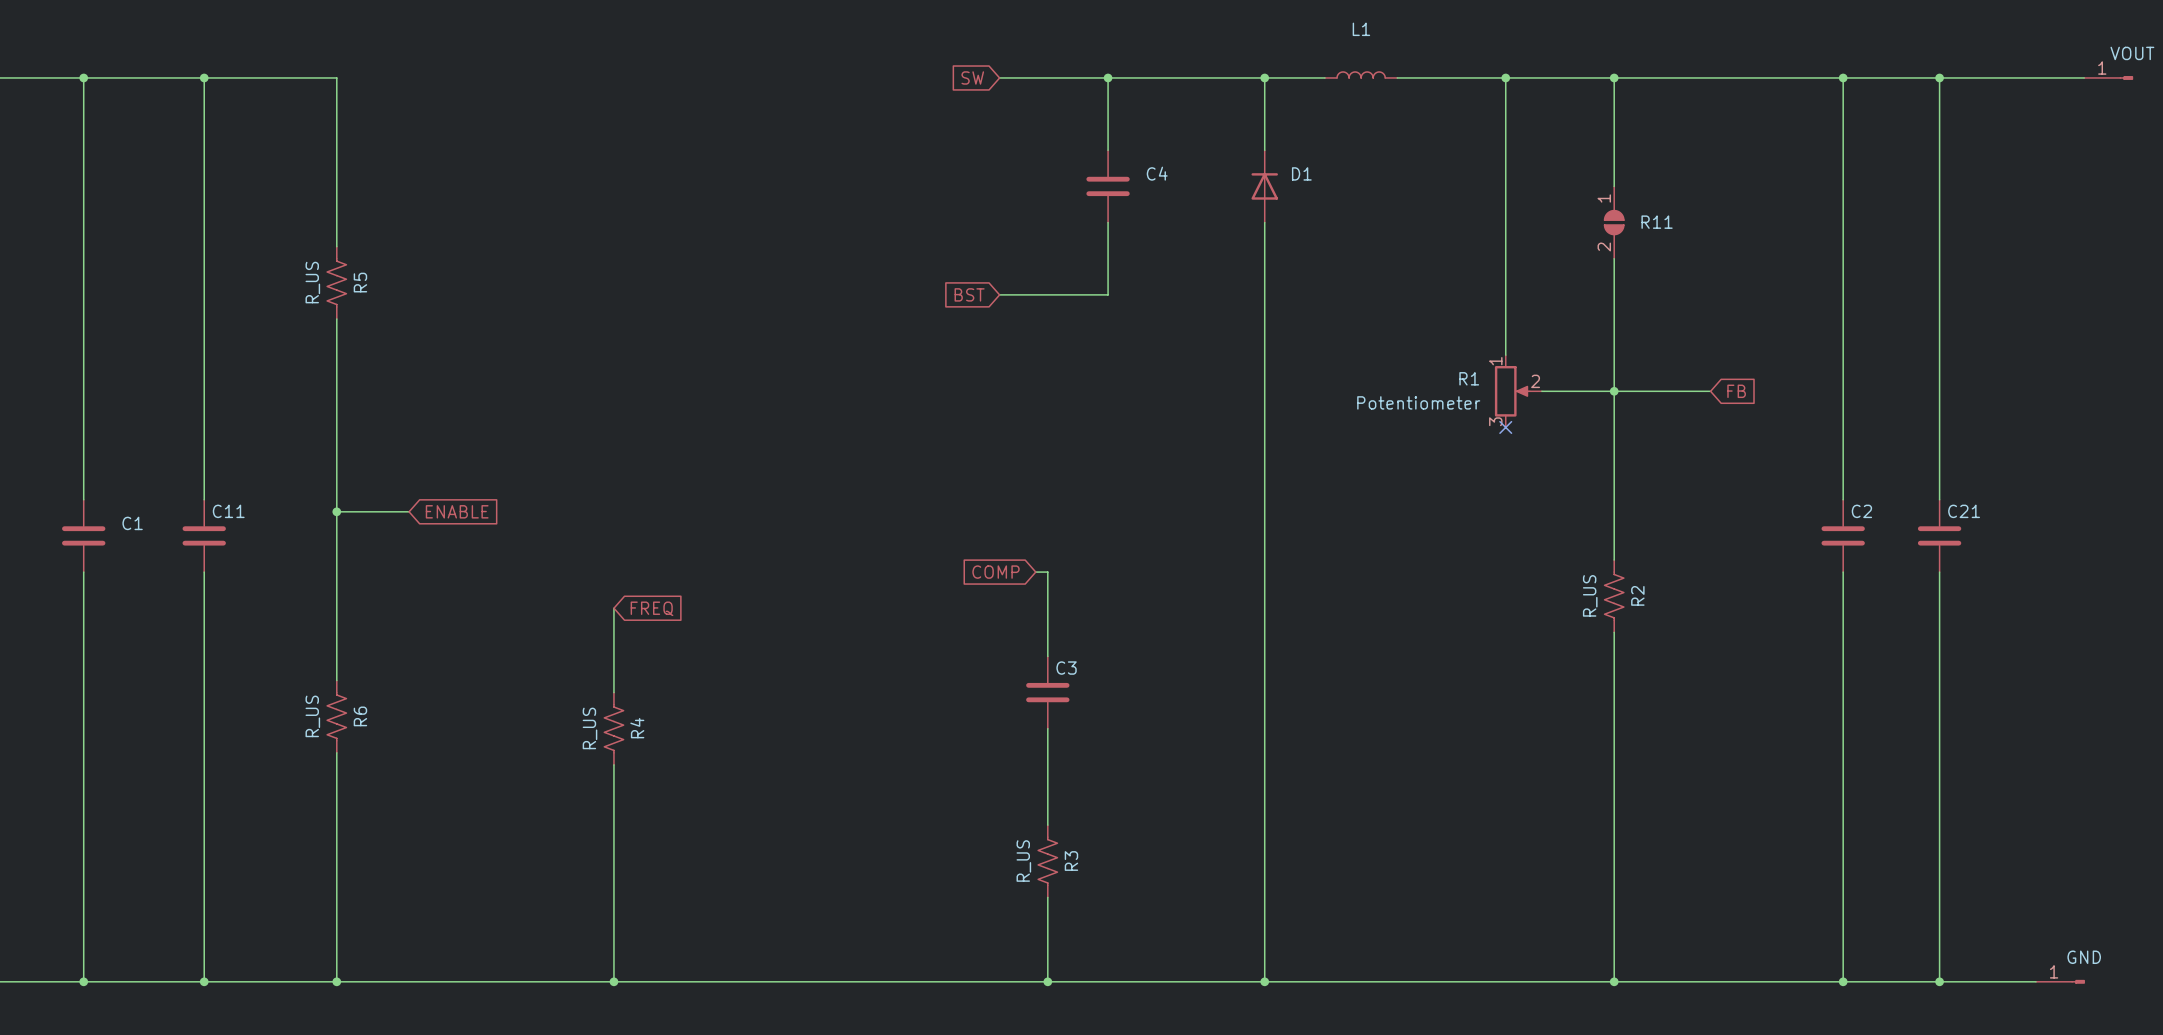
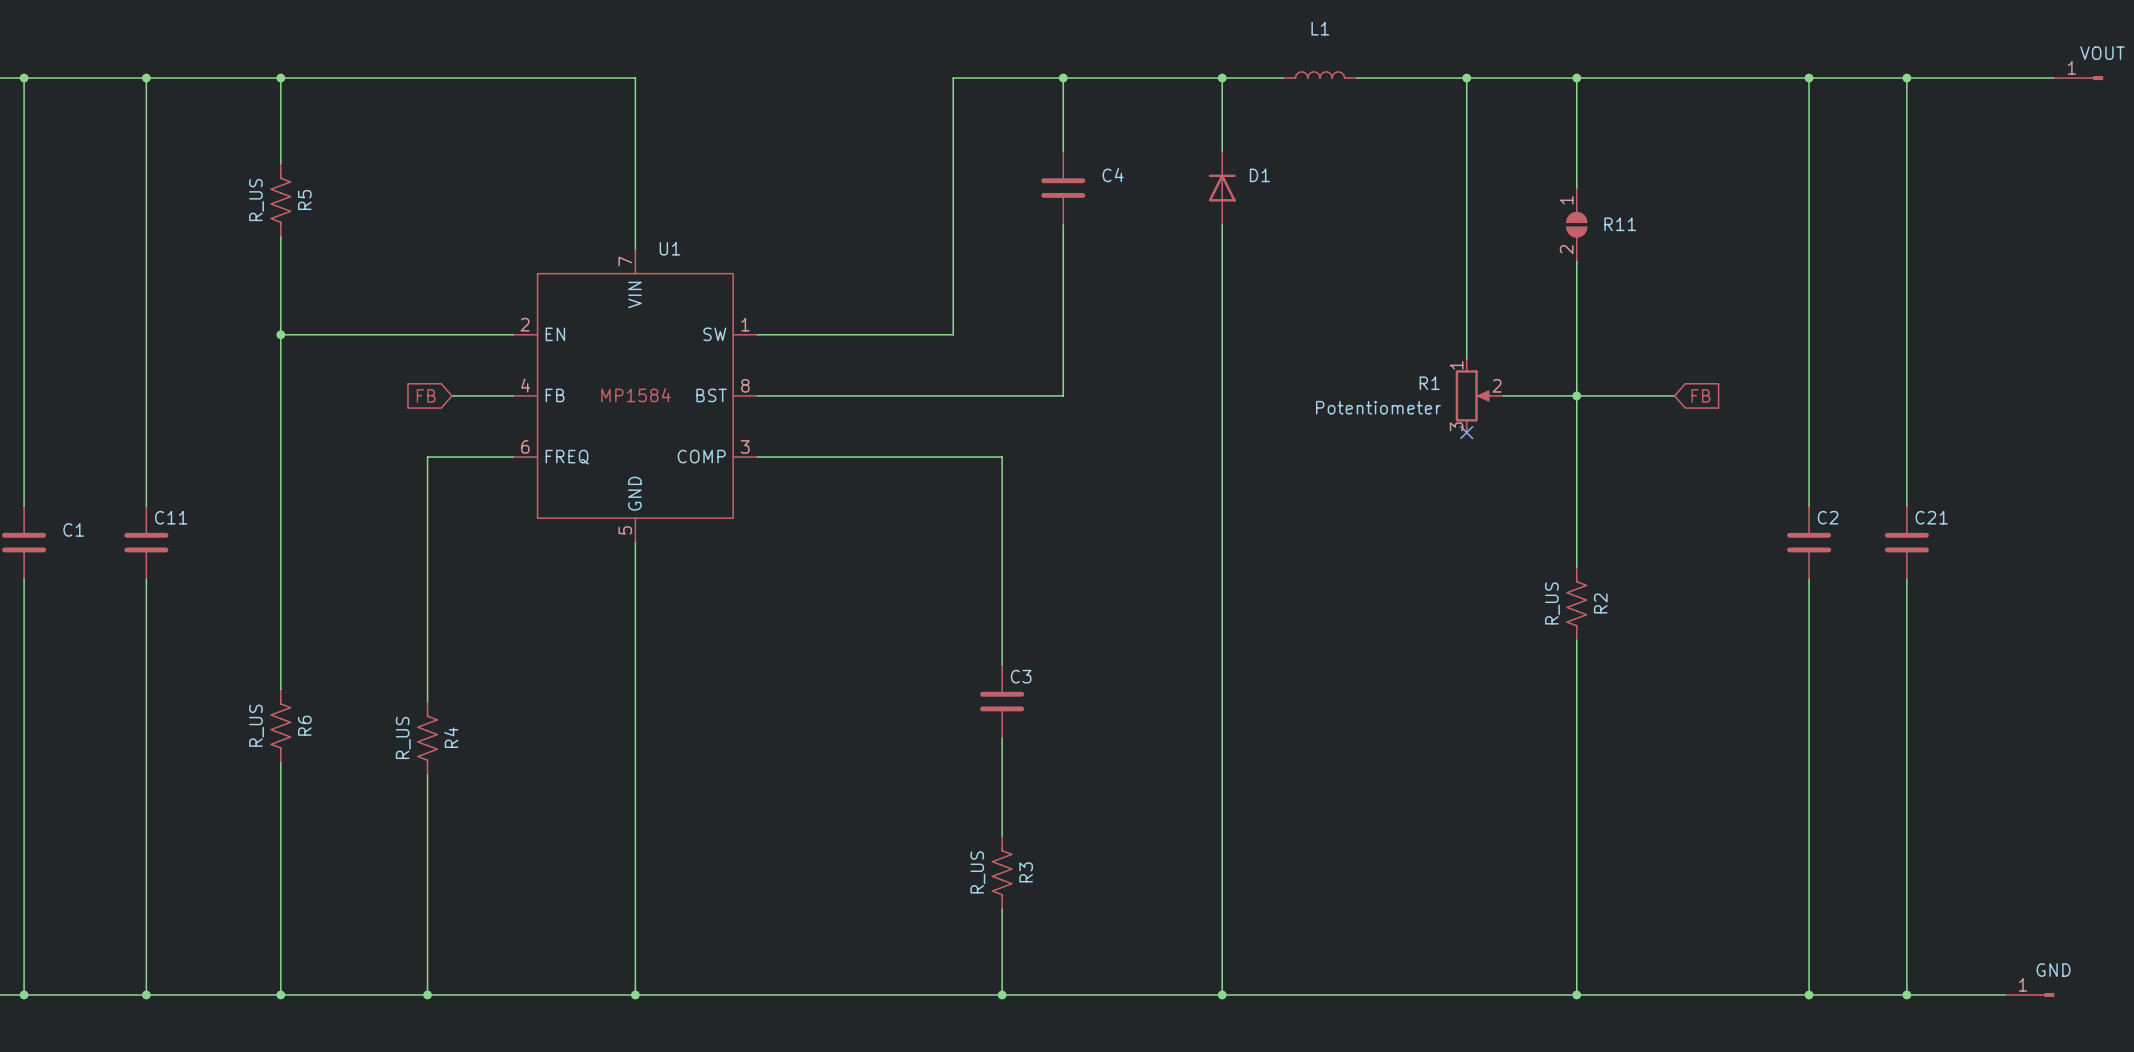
wire: none -> (280, 78) (635, 78) (635, 249)
junction: none -> (280, 78)
global label: SW (972, 77) -> none
wire: none -> (953, 78) (953, 334) (757, 334)
R5 position: (336, 282) -> (280, 200)
global label: BST (969, 294) -> none
wire: (999, 294) (1108, 294) -> (757, 395) (1063, 395) (1063, 298)
wire: none -> (280, 334) (513, 334)
junction: none -> (280, 334)
global label: none -> FB (426, 395)
wire: none -> (451, 395) (513, 395)
U1: none -> (635, 395)
wire: none -> (513, 457) (427, 457) (427, 701)
wire: (336, 511) (409, 511) -> none
junction: (336, 511) -> none
global label: ENABLE (457, 511) -> none
wire: none -> (635, 542) (635, 994)
global label: COMP (995, 572) -> none
wire: (1035, 572) (1047, 572) -> (757, 457) (1002, 457) (1002, 579)
wire: (613, 608) (613, 692) -> none
global label: FREQ (652, 608) -> none
R4 position: (613, 728) -> (427, 738)
wire: (613, 764) (613, 981) -> (427, 774) (427, 994)
junction: none -> (427, 994)
junction: (613, 981) -> none
junction: none -> (635, 994)

